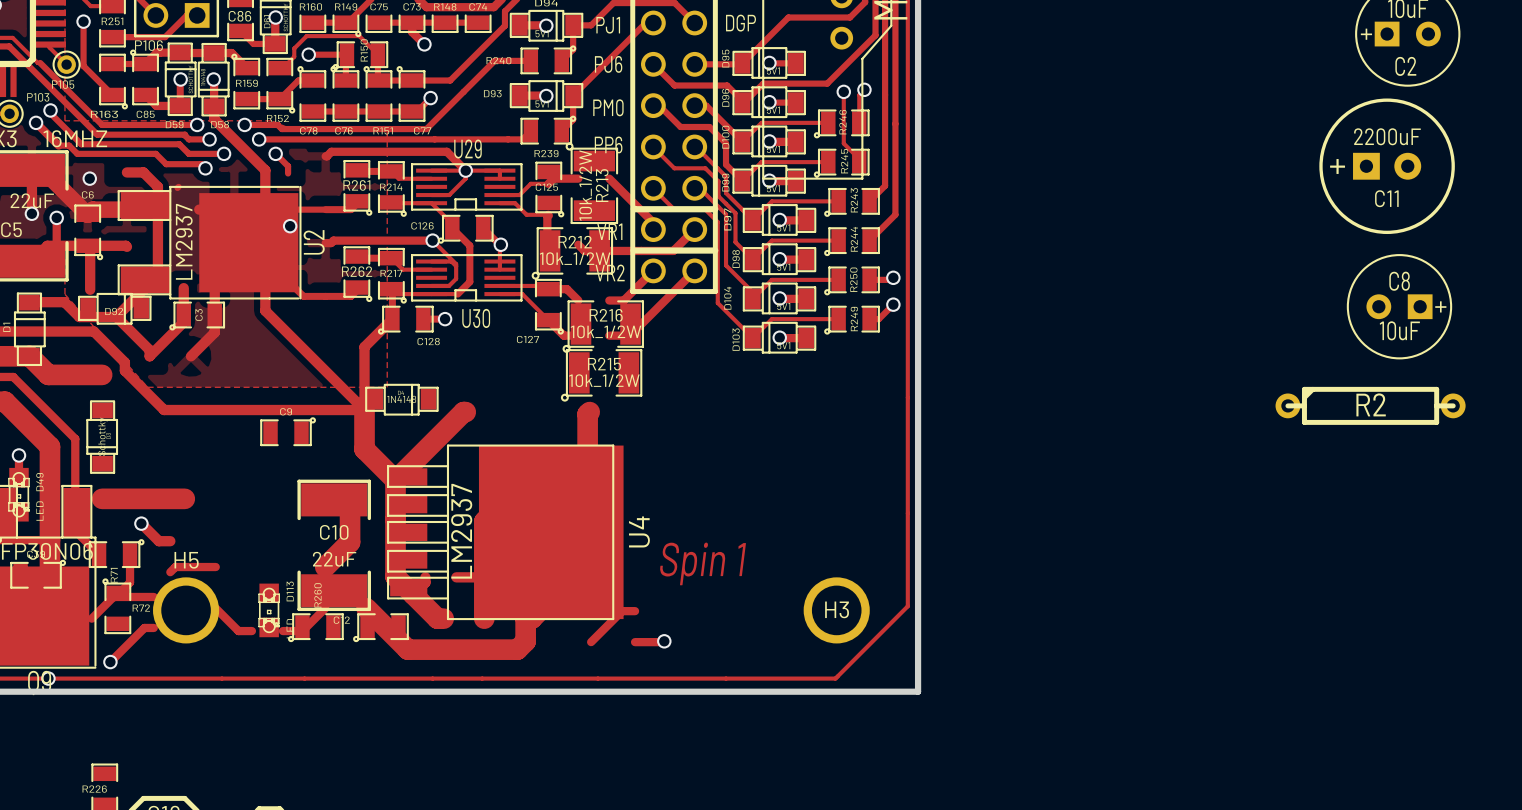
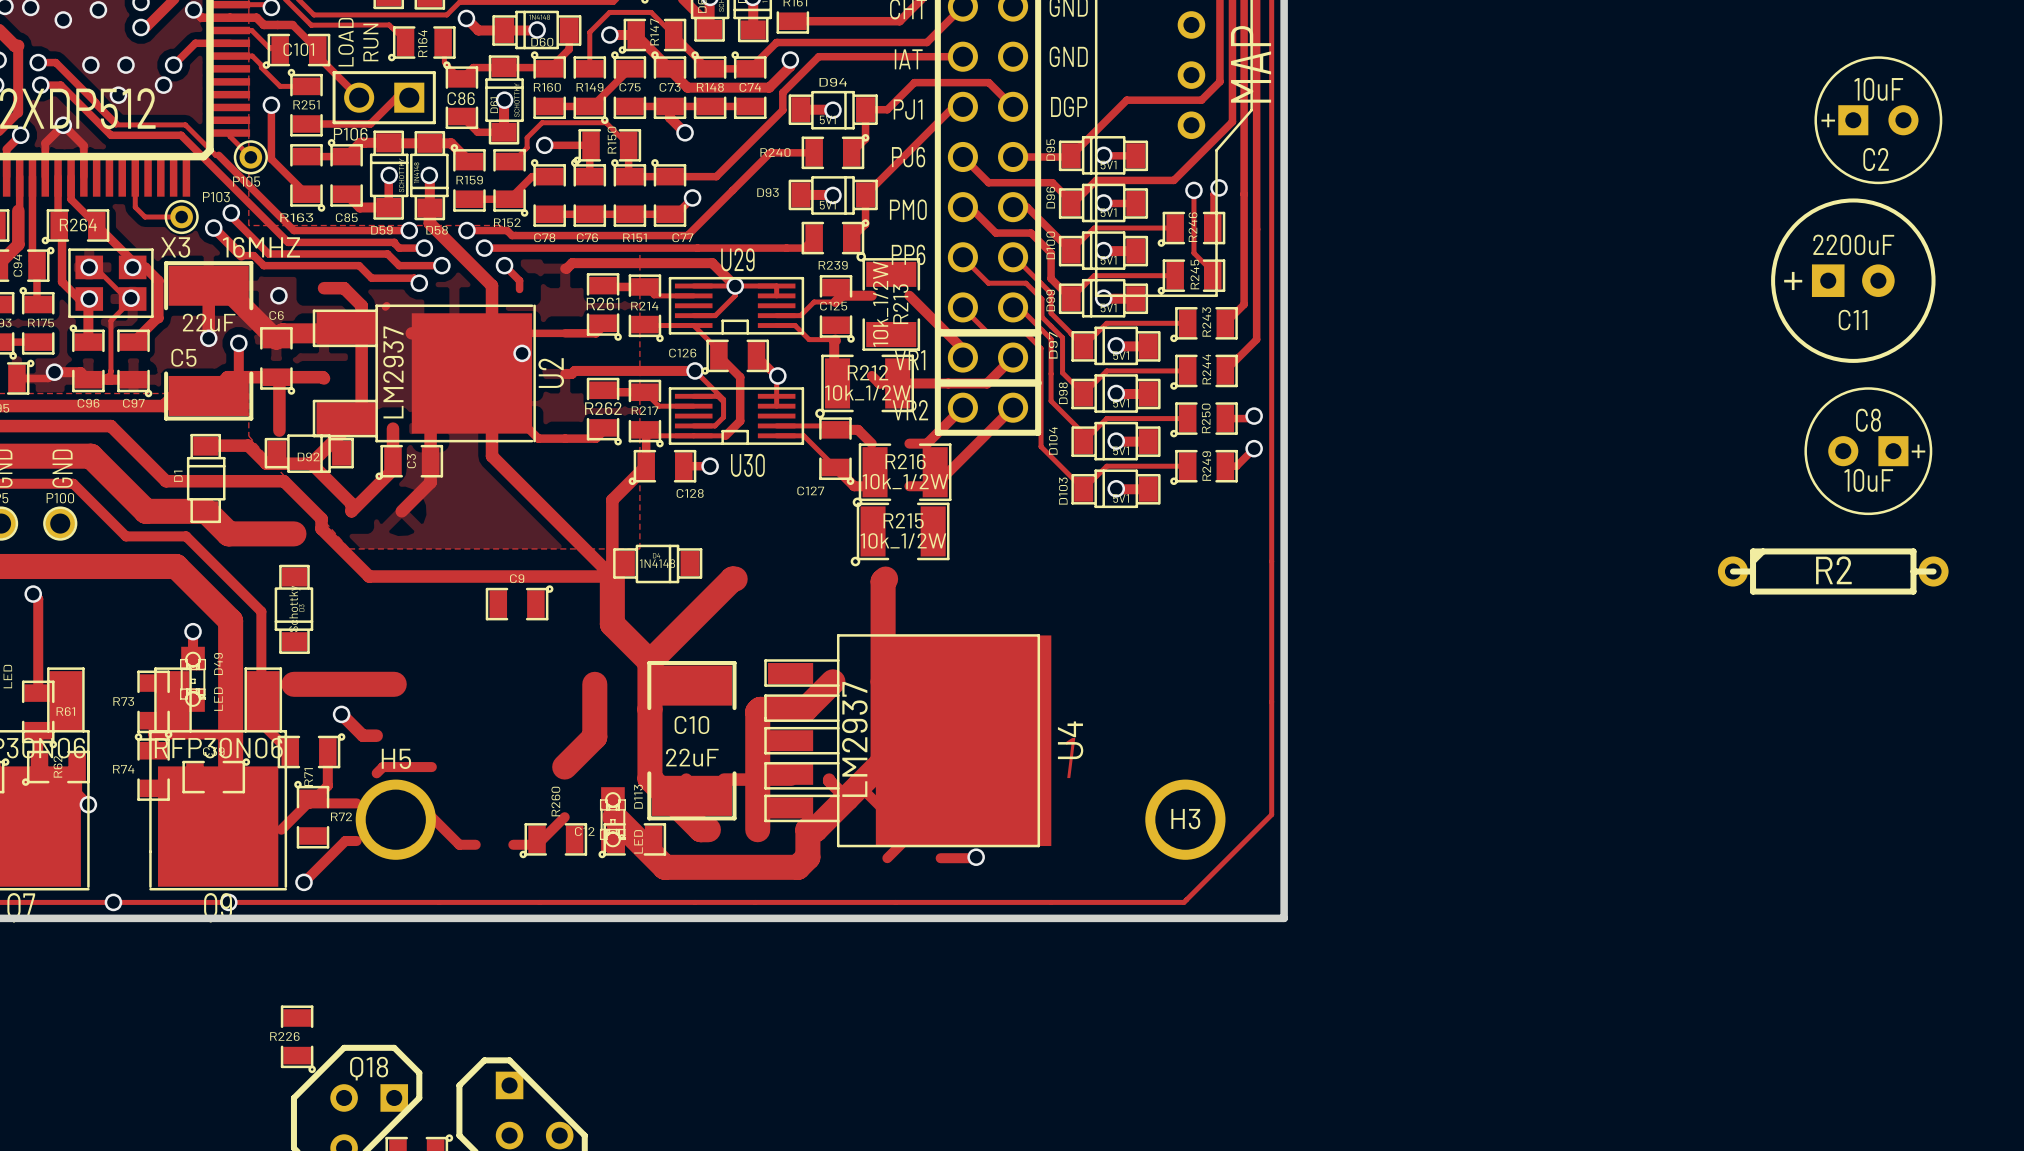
U4 position: (505, 532) -> (907, 740)
C10 position: (334, 545) -> (691, 740)
D113 position: (269, 610) -> (612, 819)

